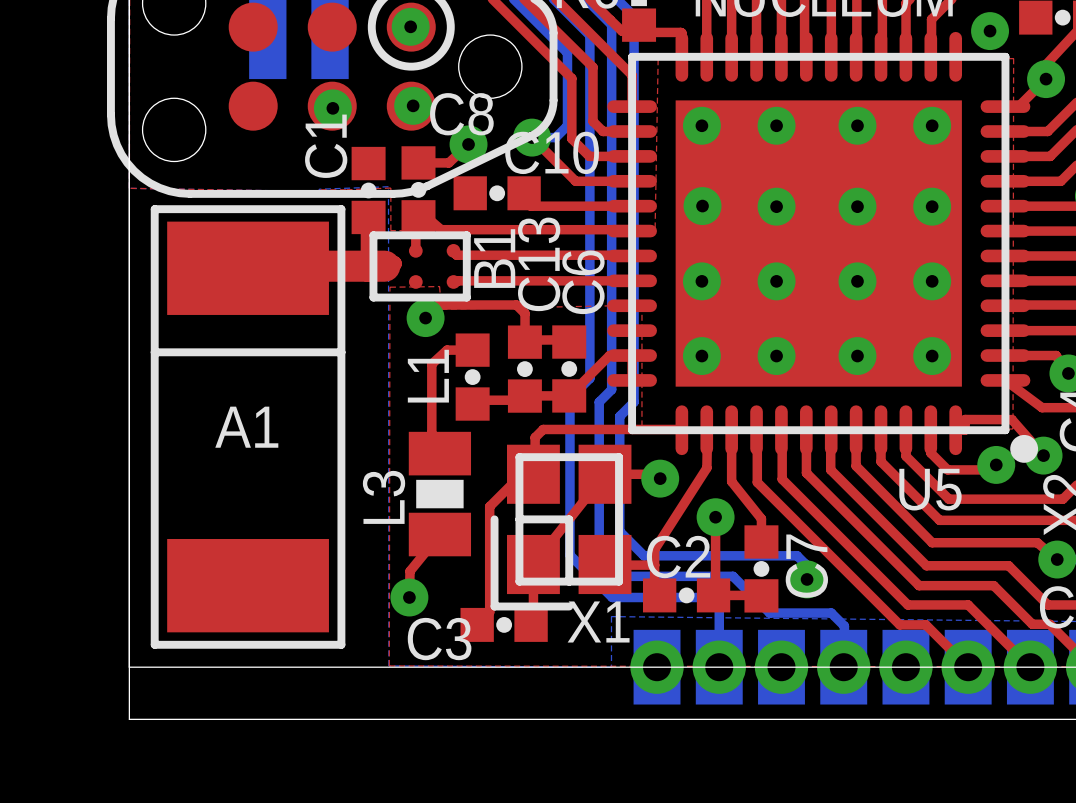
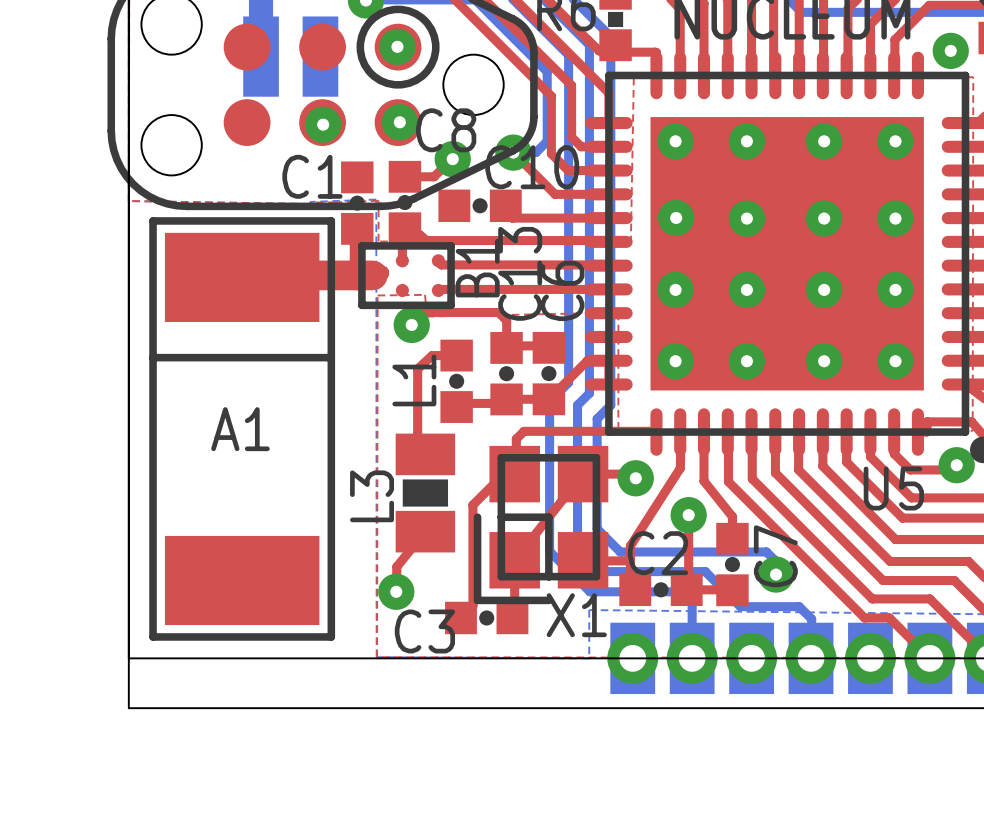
C1 name rotation: 0° (326, 146) -> 90° clockwise (312, 176)

